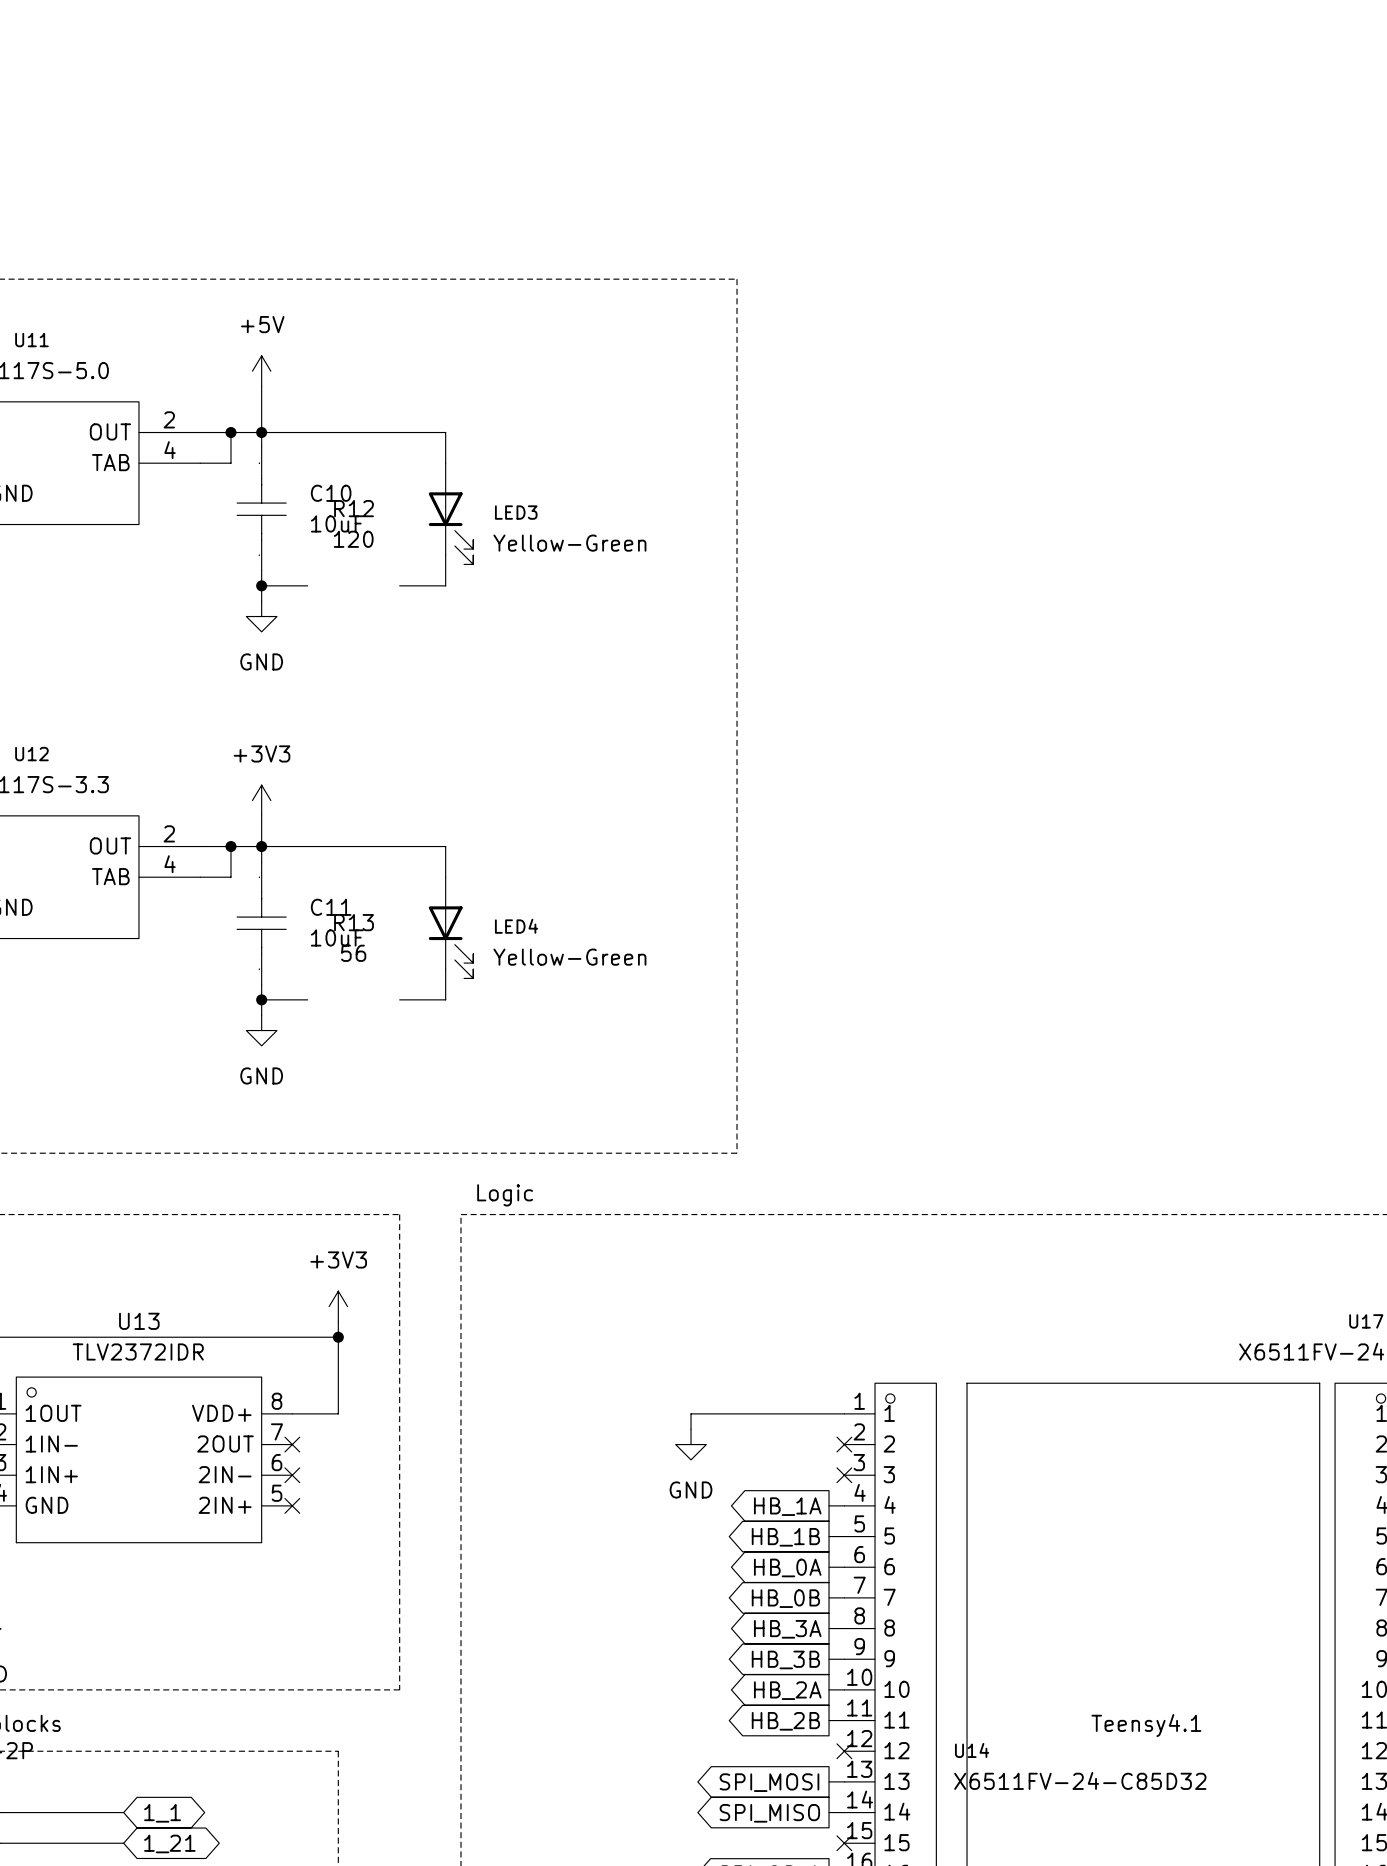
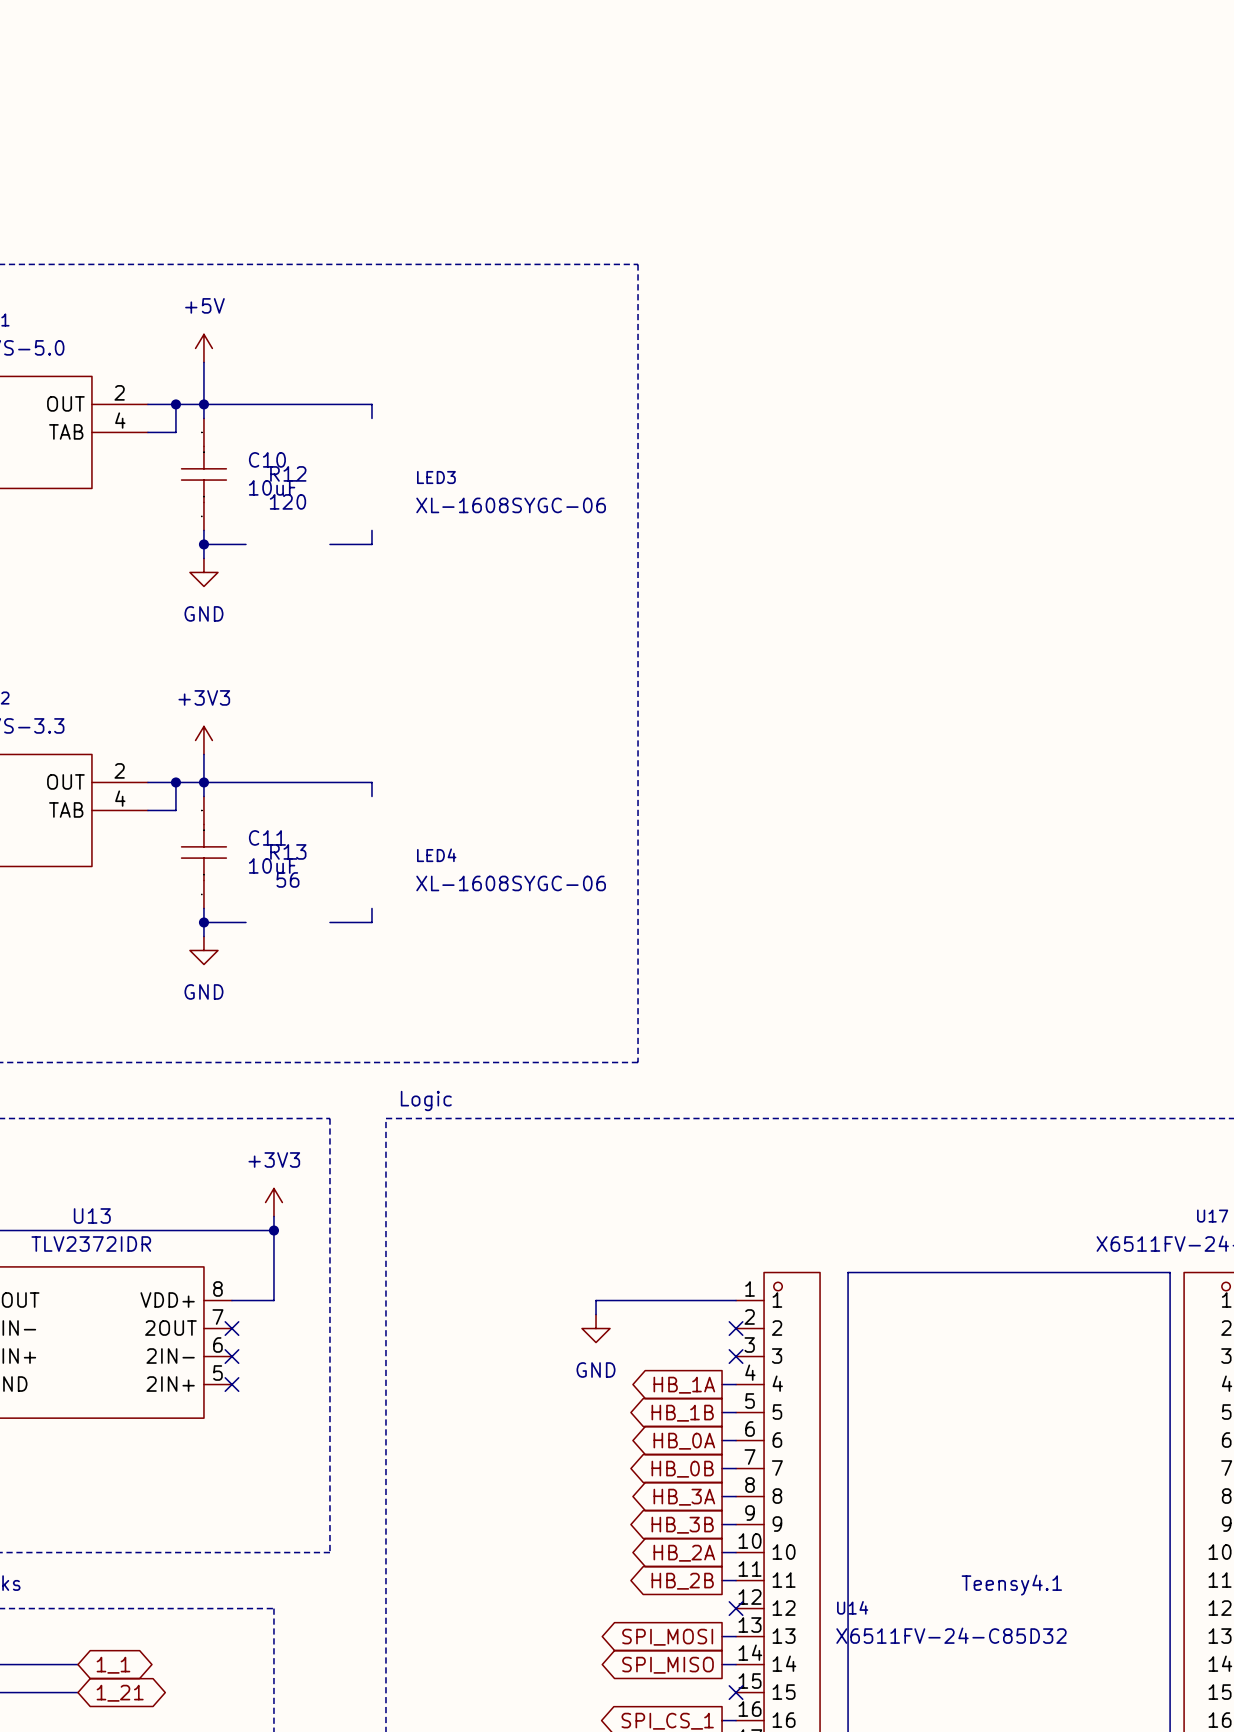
wire: (445, 447) (445, 463) -> none
LED3 symbol: [428, 463, 474, 565] -> [416, 470, 606, 514]
LED3 value: Yellow-Green (569, 543) -> XL-1608SYGC-06 (511, 505)
wire: (445, 555) (445, 570) -> none
wire: (445, 861) (445, 877) -> none
LED4 symbol: [428, 877, 474, 979] -> [416, 848, 606, 892]
LED4 value: Yellow-Green (569, 957) -> XL-1608SYGC-06 (511, 883)
wire: (445, 969) (445, 984) -> none

